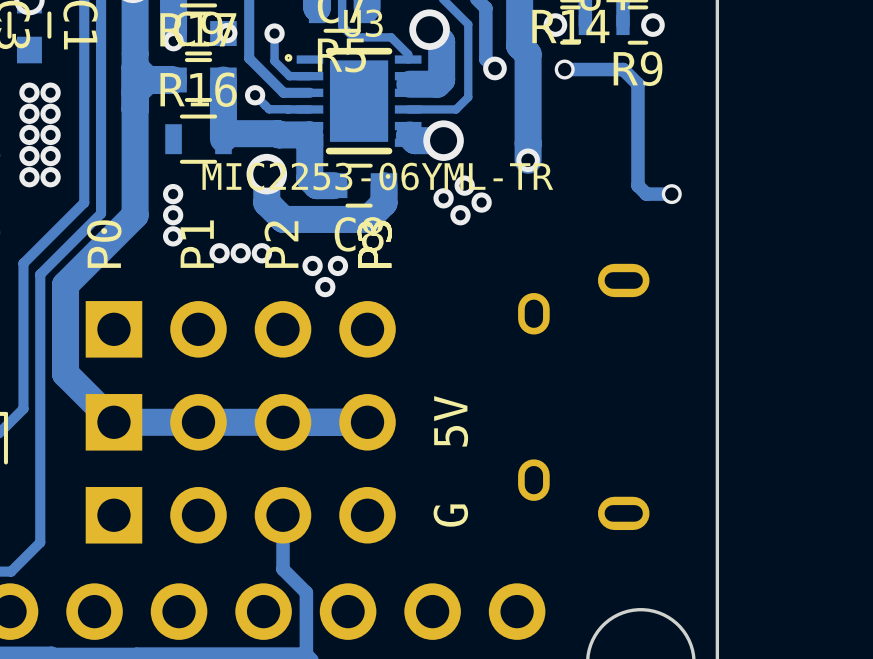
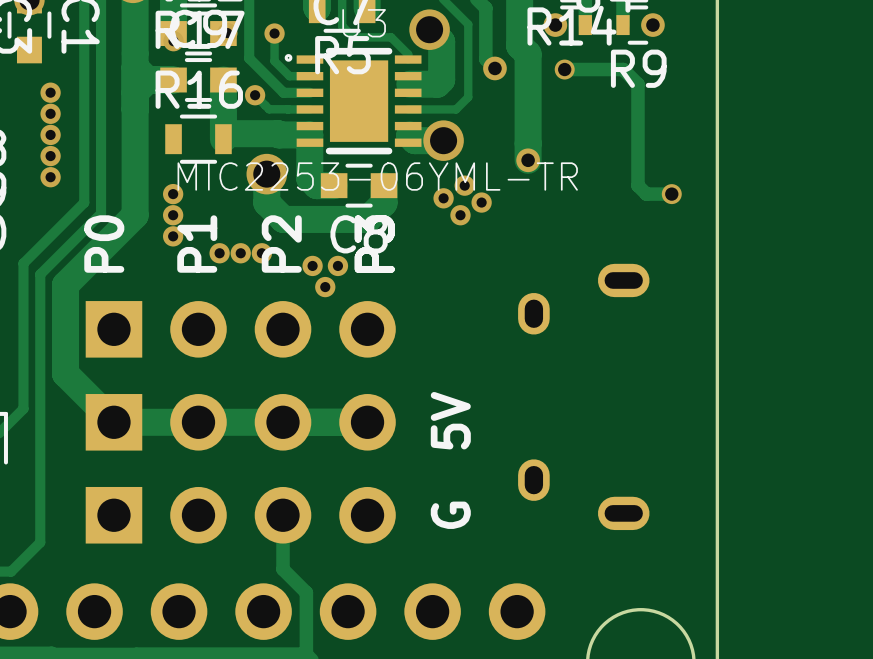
via: (29, 92) -> none
via: (29, 113) -> none
via: (29, 134) -> none
via: (29, 156) -> none
via: (29, 177) -> none

